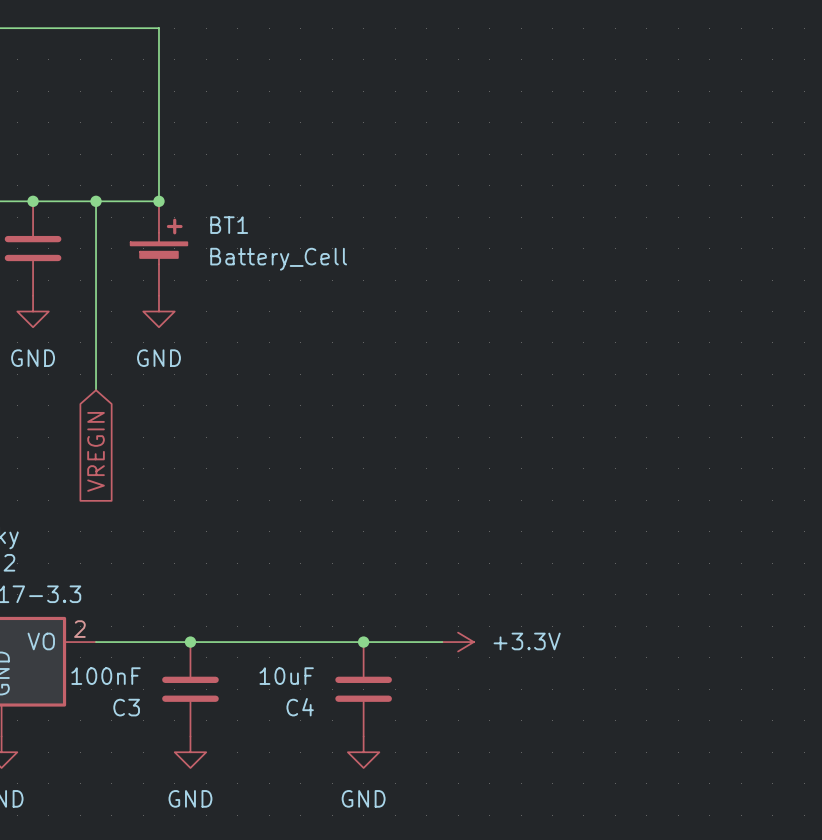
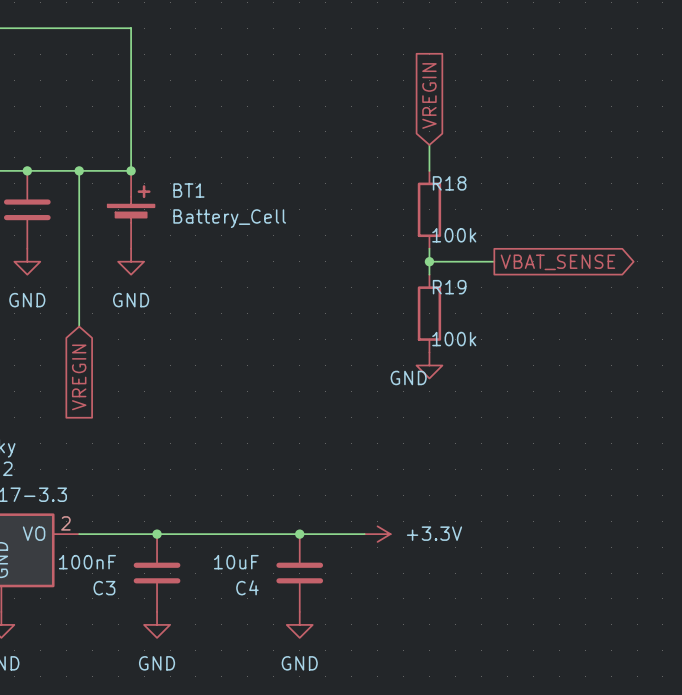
global label: none -> VREGIN (429, 95)
wire: none -> (429, 144) (429, 170)
R18: none -> 100k (429, 209)
wire: none -> (429, 248) (429, 274)
wire: none -> (429, 261) (494, 261)
junction: none -> (429, 261)
global label: none -> VBAT_SENSE (557, 262)
R19: none -> 100k (429, 313)
power symbol: none -> GND (429, 365)

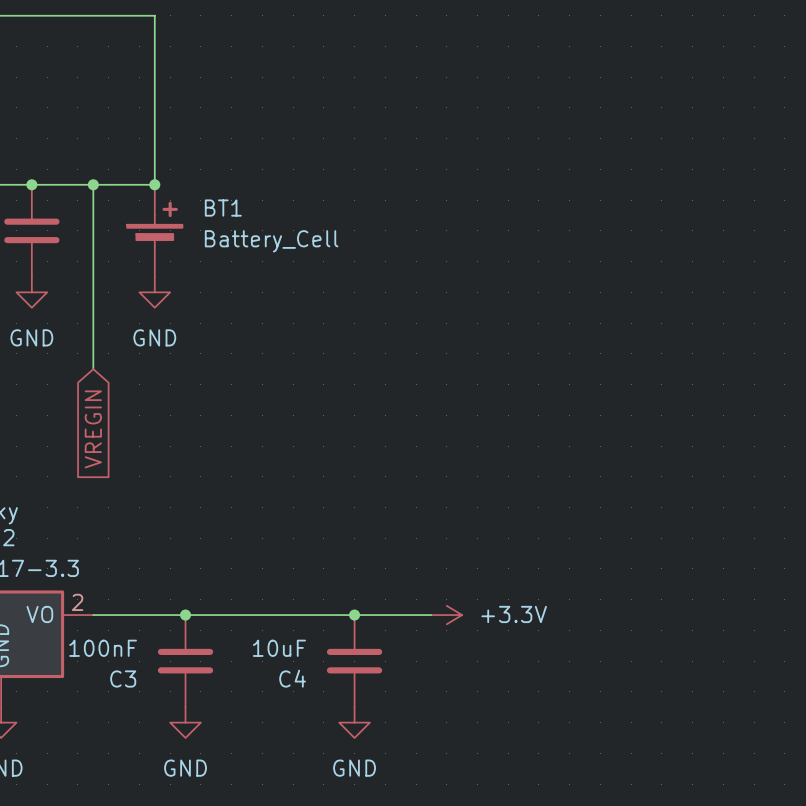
global label: VREGIN (429, 95) -> none
wire: (429, 144) (429, 170) -> none
R18: 100k (429, 209) -> none
wire: (429, 248) (429, 274) -> none
wire: (429, 261) (494, 261) -> none
junction: (429, 261) -> none
global label: VBAT_SENSE (557, 262) -> none
R19: 100k (429, 313) -> none
power symbol: GND (429, 365) -> none

